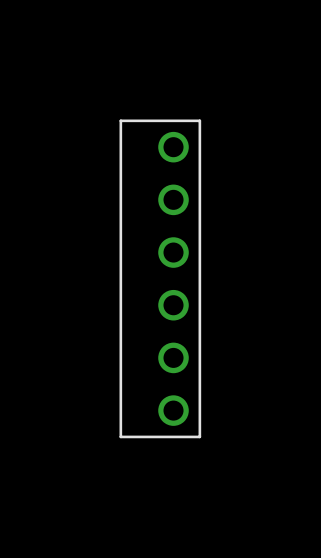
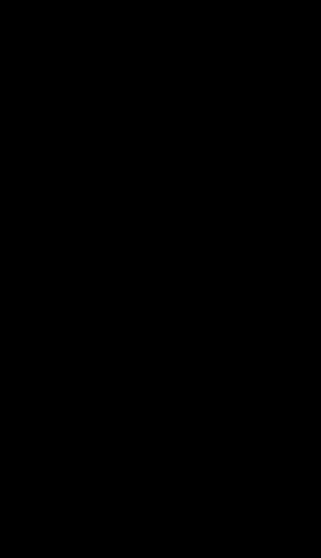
part: (160, 278) -> none

